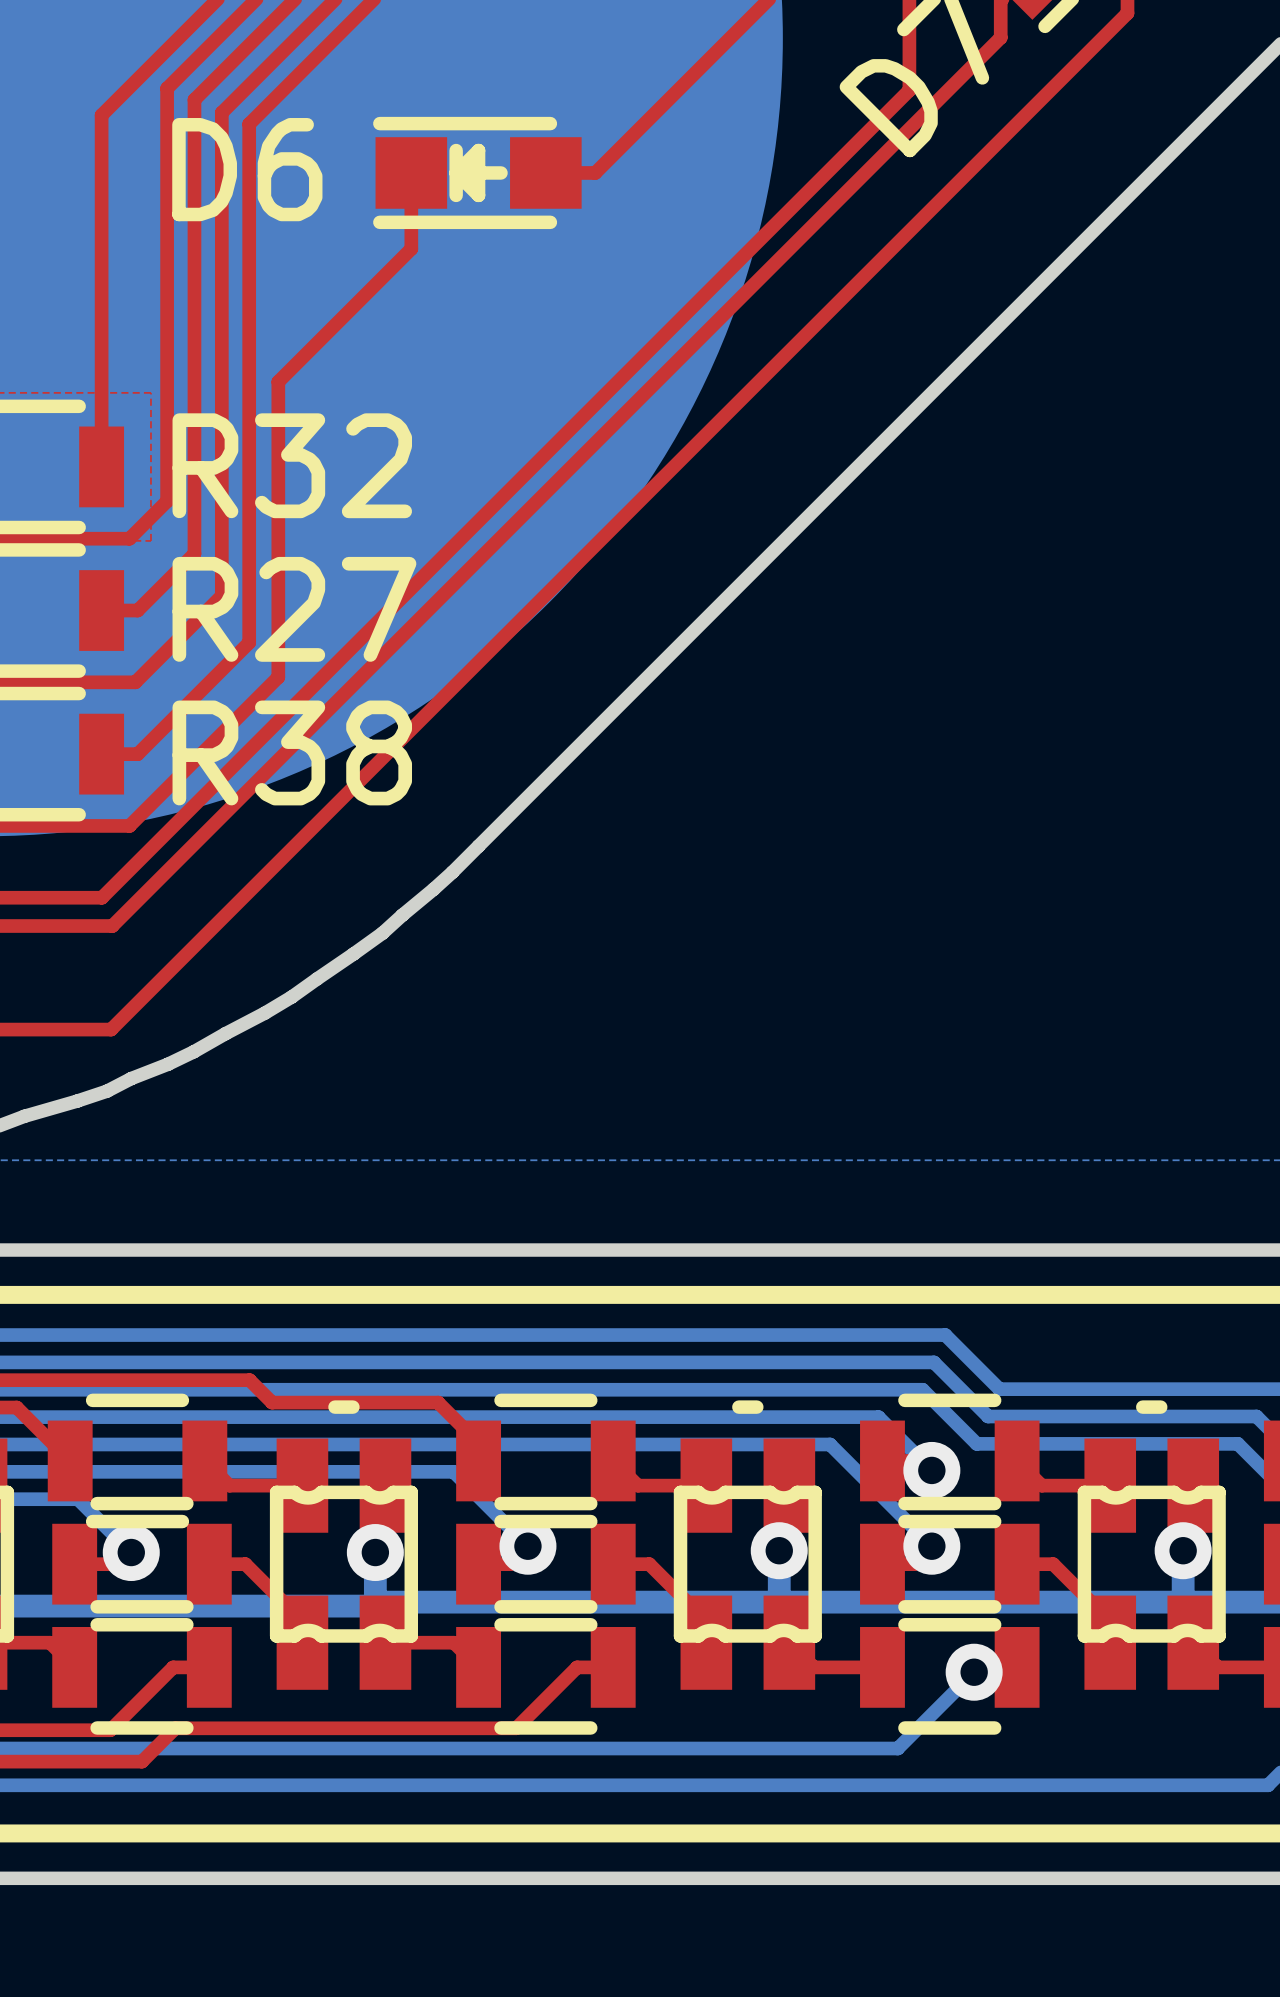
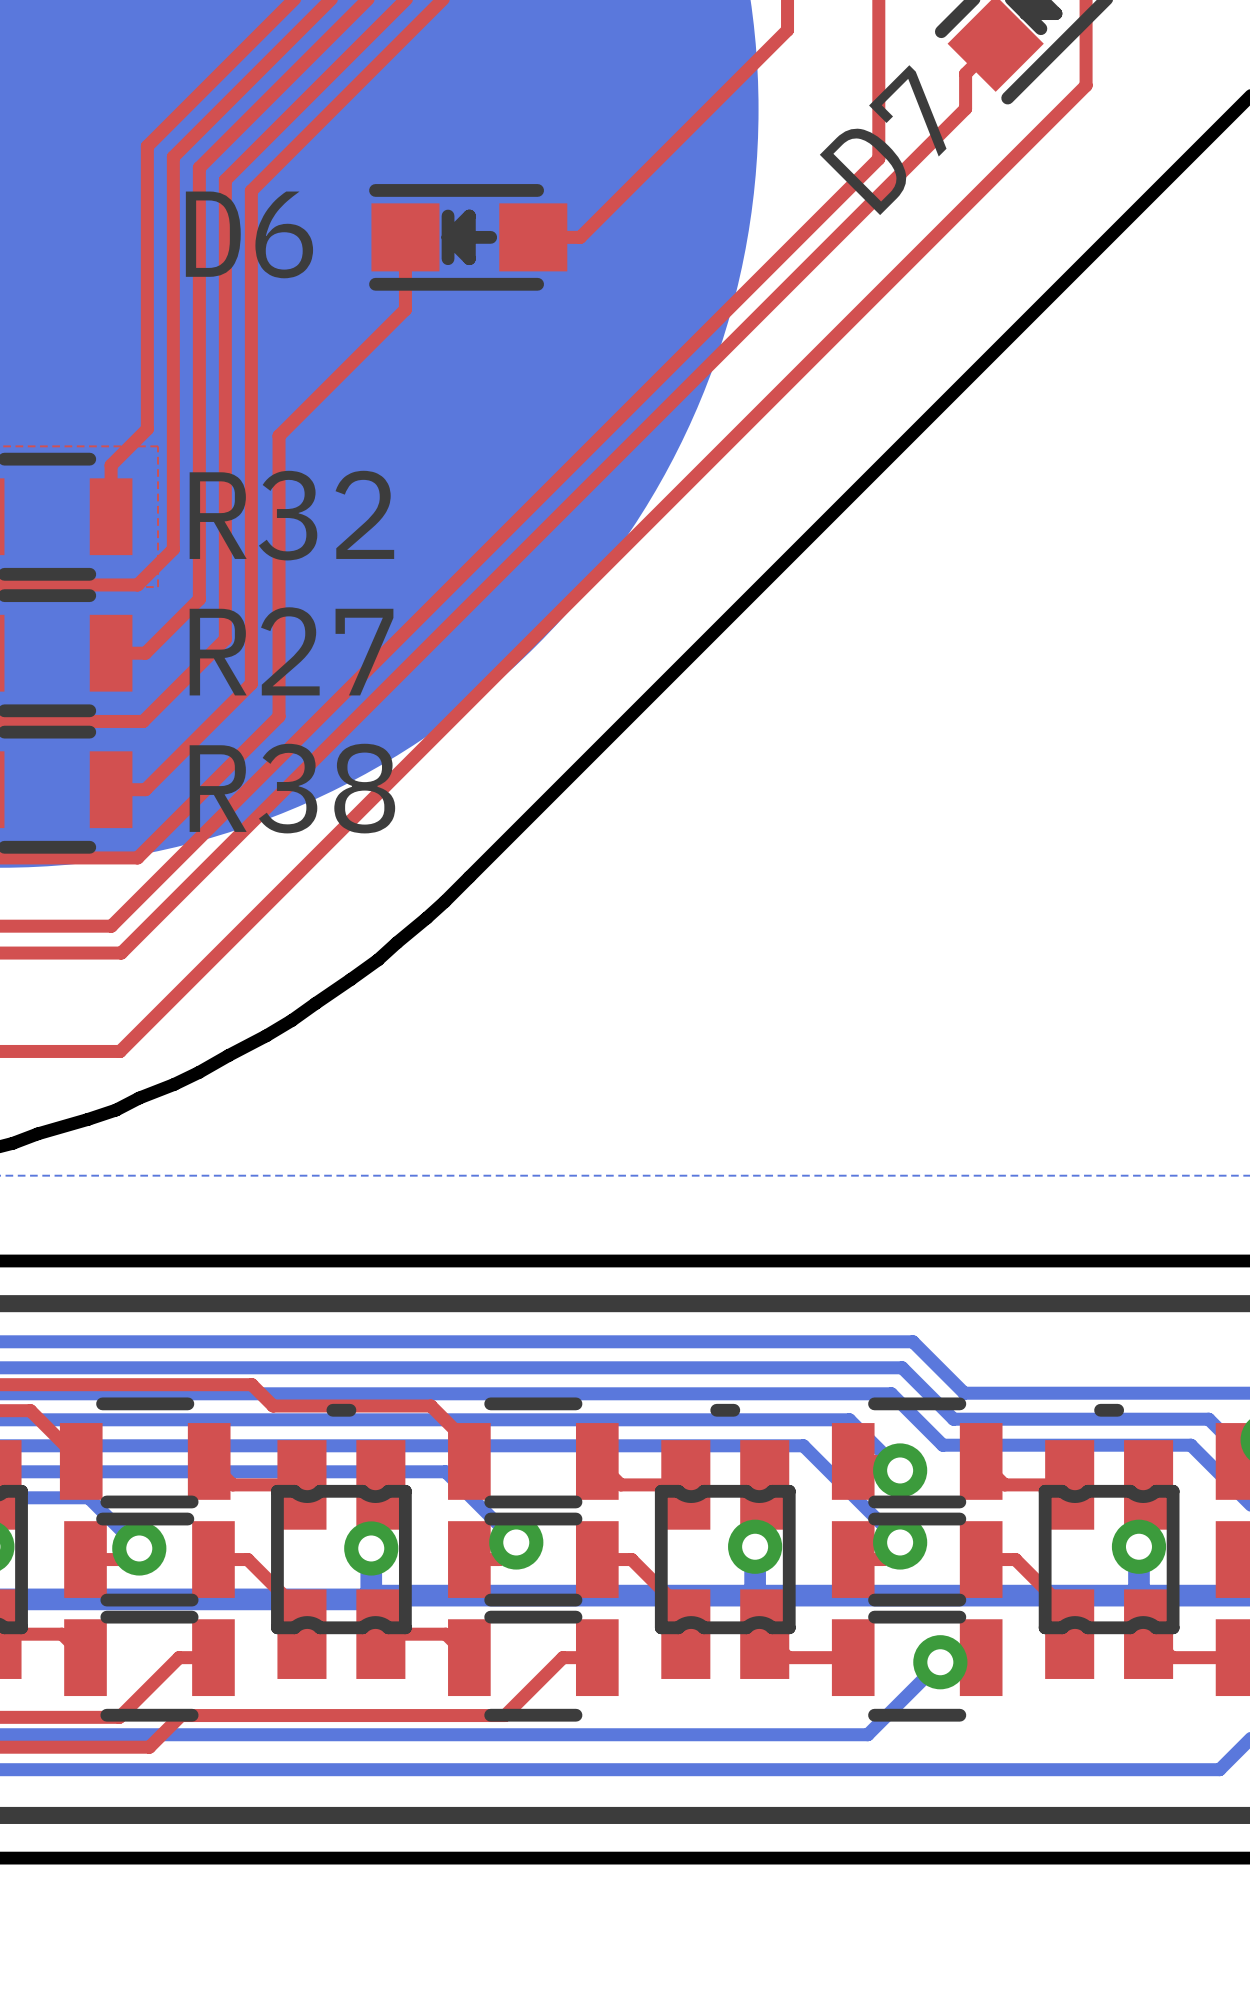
top track: (139, 77) (101, 115) (101, 412) -> (147, 146) (147, 429) (111, 465)

